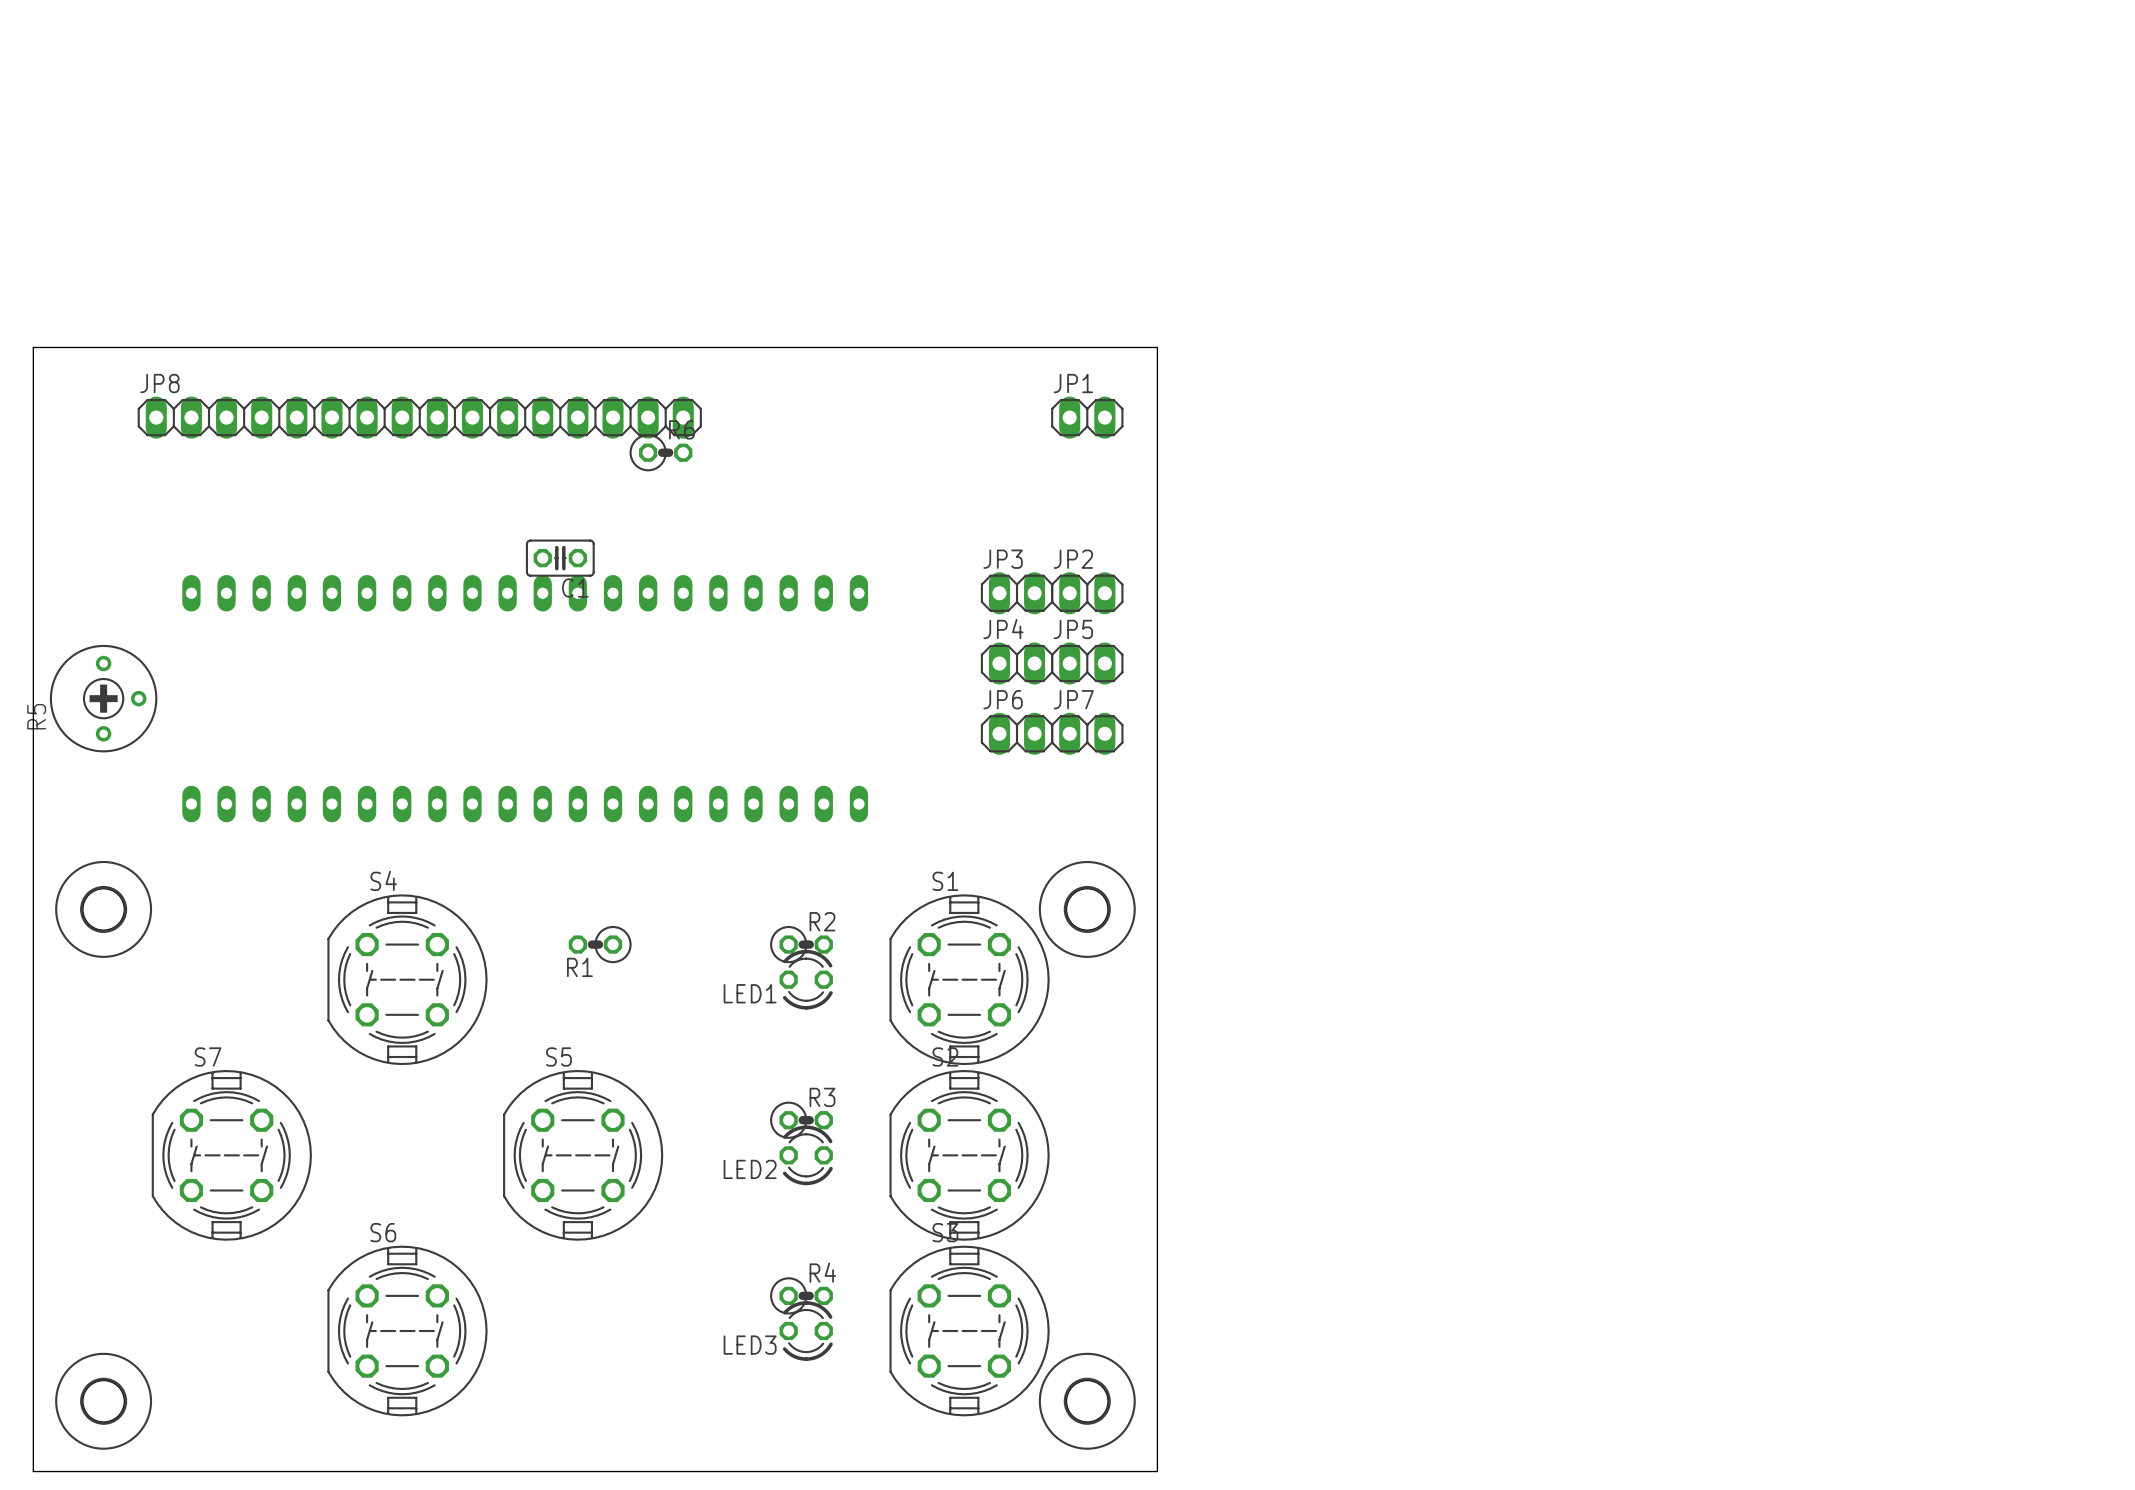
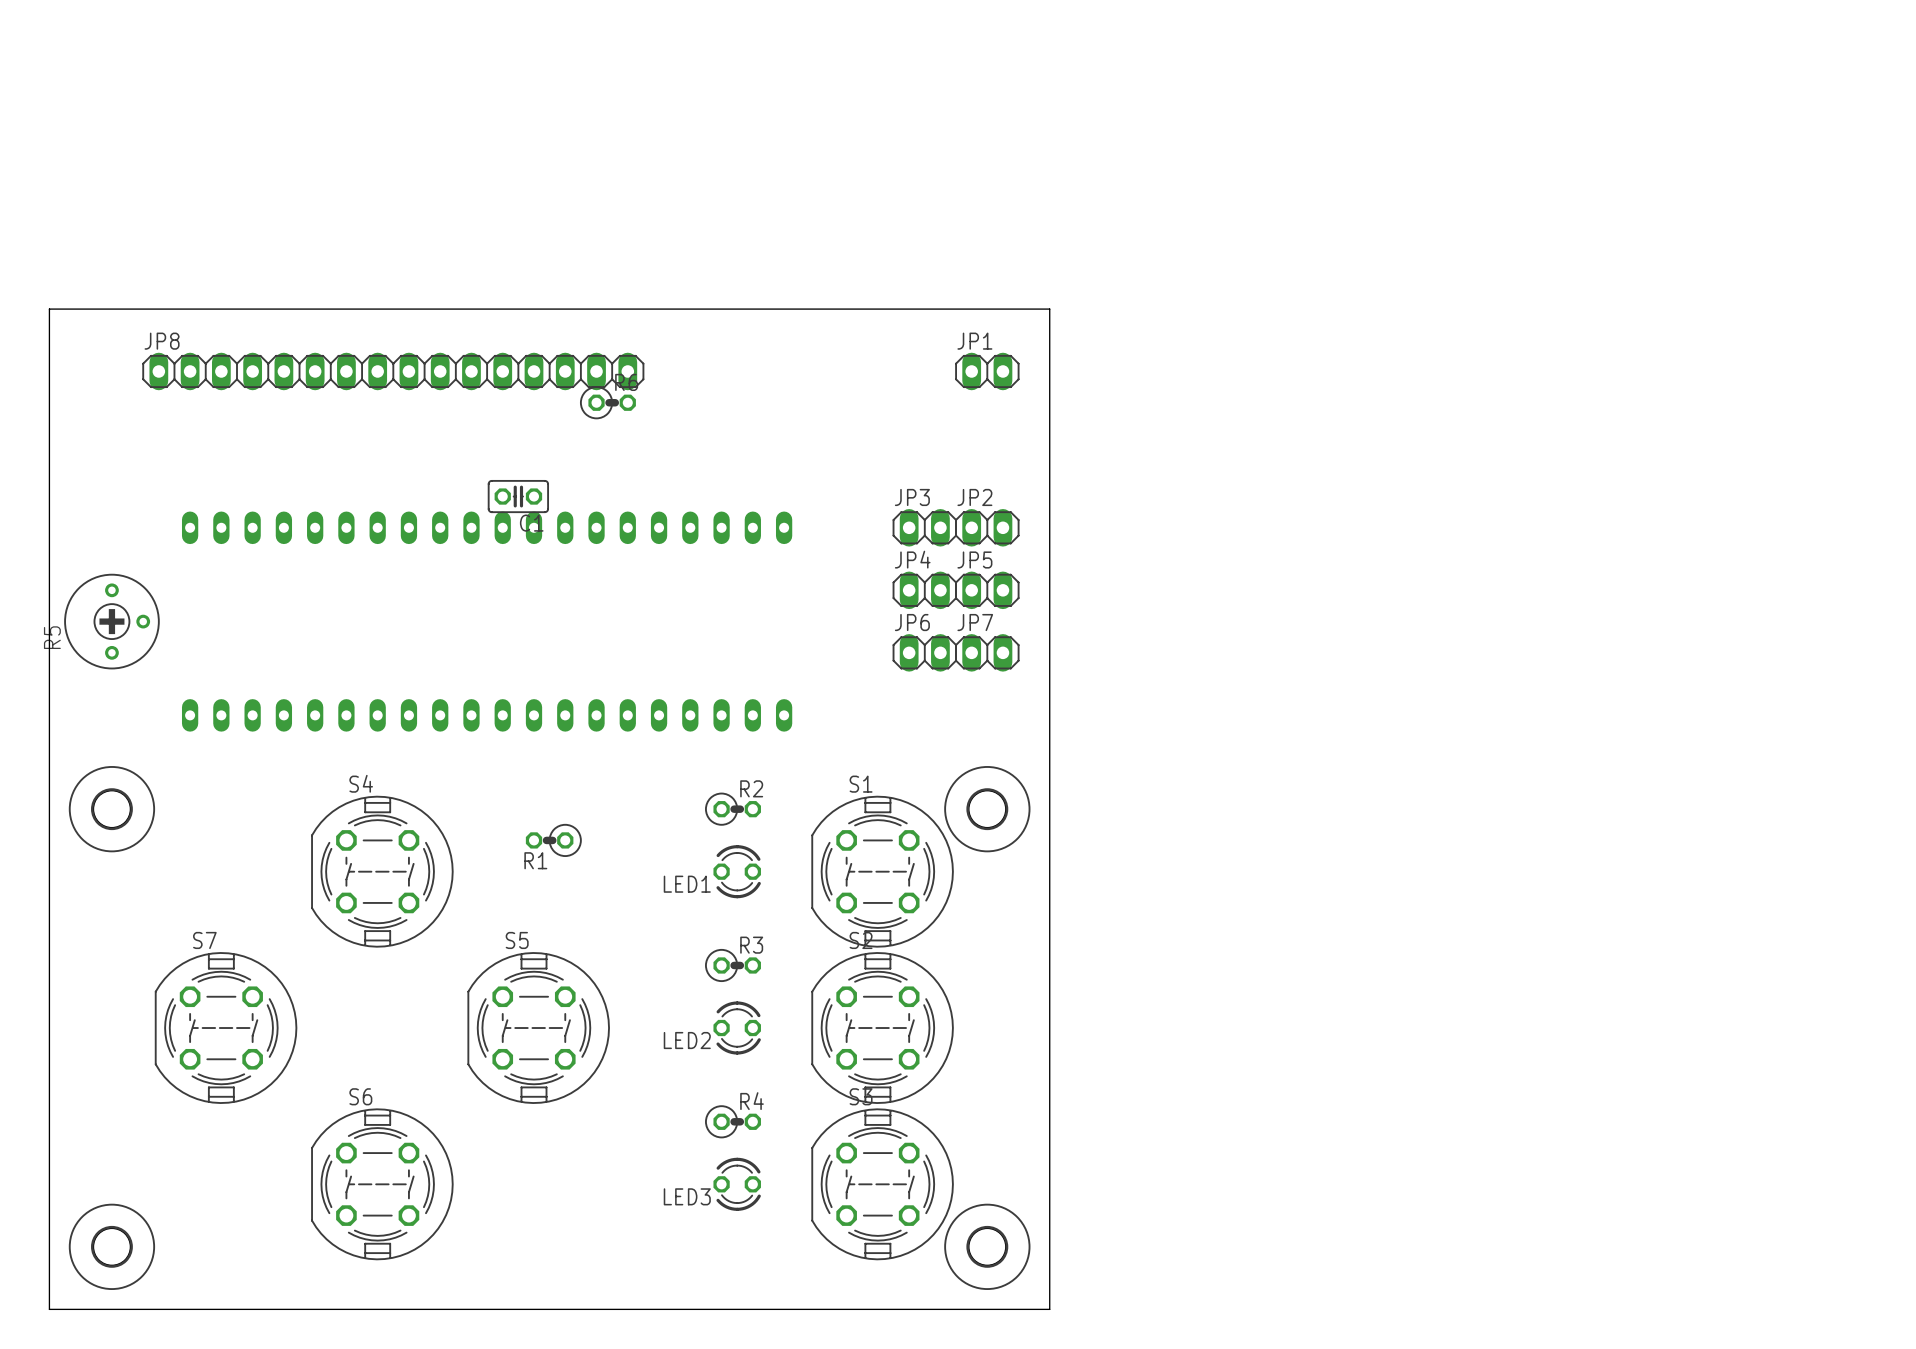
R2 position: (801, 944) -> (732, 809)
R3 position: (801, 1120) -> (732, 965)
R4 position: (801, 1295) -> (732, 1121)

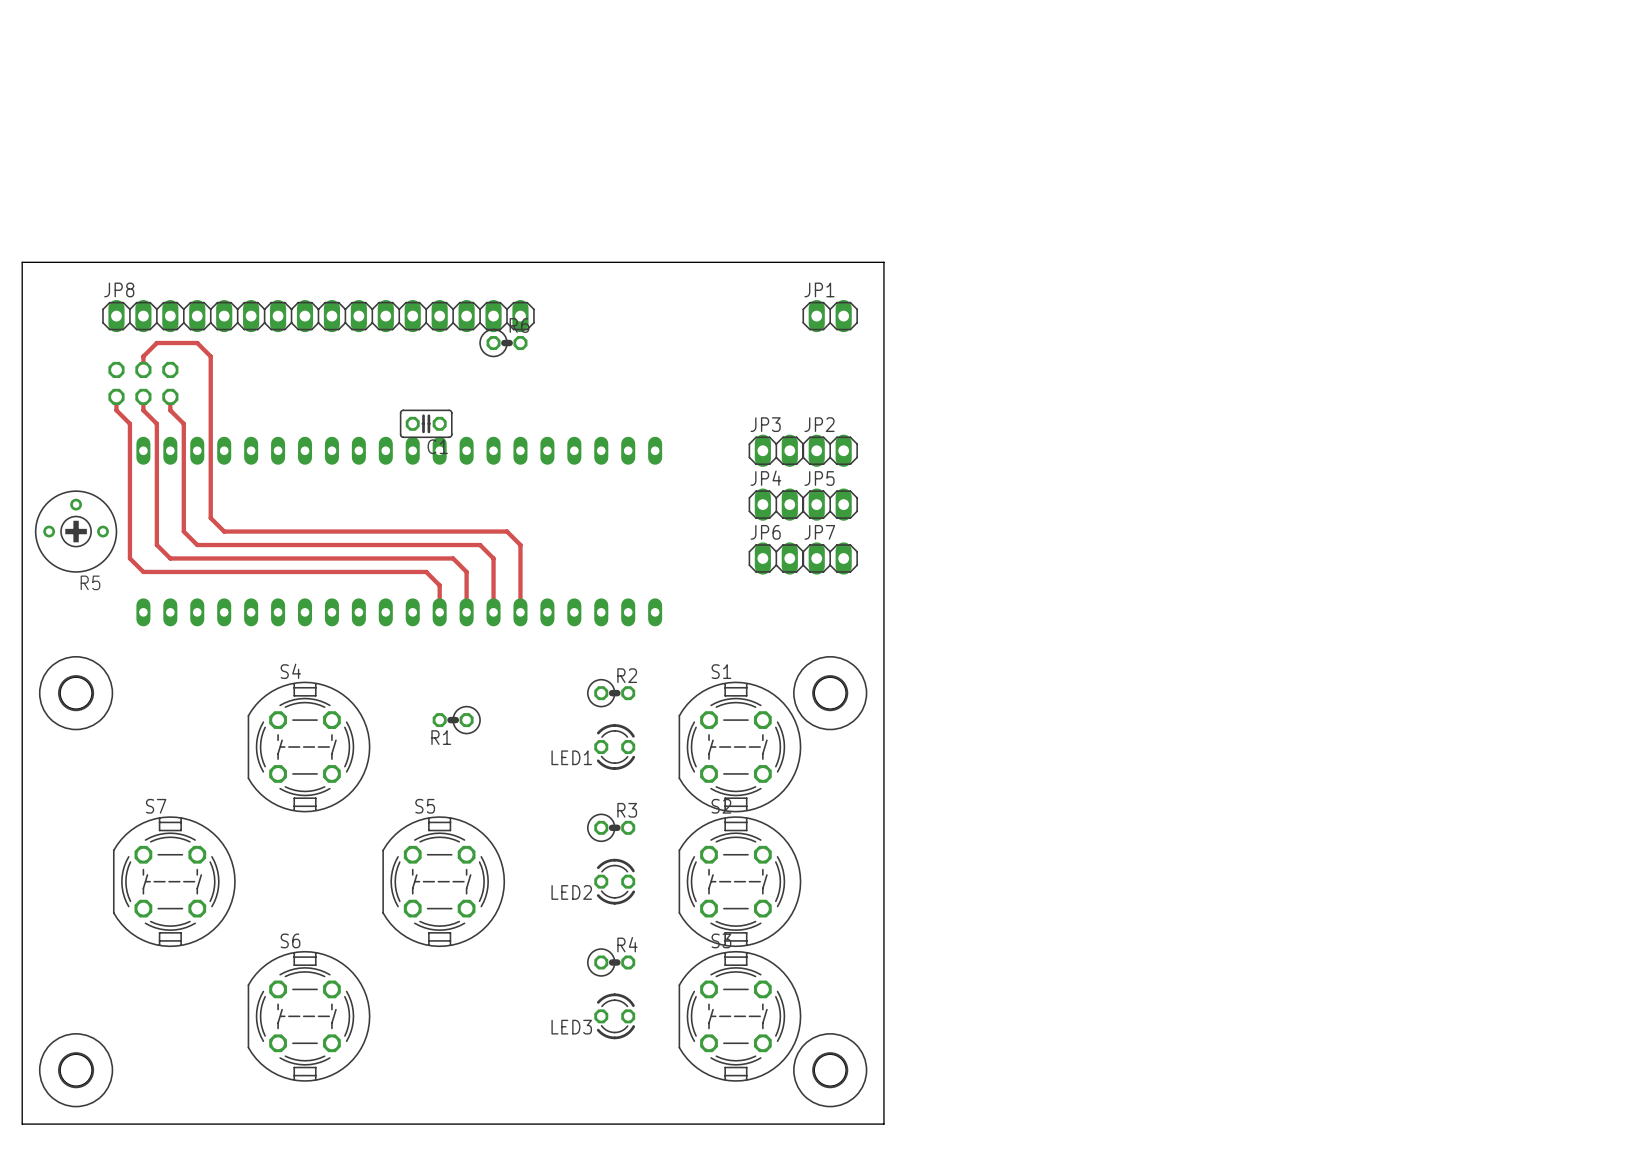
track: none -> (143, 369) (143, 356) (156, 343) (197, 343) (210, 356) (210, 518) (224, 531) (507, 531) (520, 545) (520, 612)
part: none -> (143, 383)
track: none -> (116, 396) (116, 410) (129, 423) (129, 558) (143, 571) (426, 571) (439, 585) (439, 612)
track: none -> (143, 396) (143, 410) (156, 423) (156, 545) (170, 558) (453, 558) (466, 571) (466, 612)
track: none -> (170, 396) (170, 410) (183, 423) (183, 531) (197, 545) (480, 545) (493, 558) (493, 612)
R5 rotation: 0° (111, 621) -> 90° counterclockwise (76, 531)

